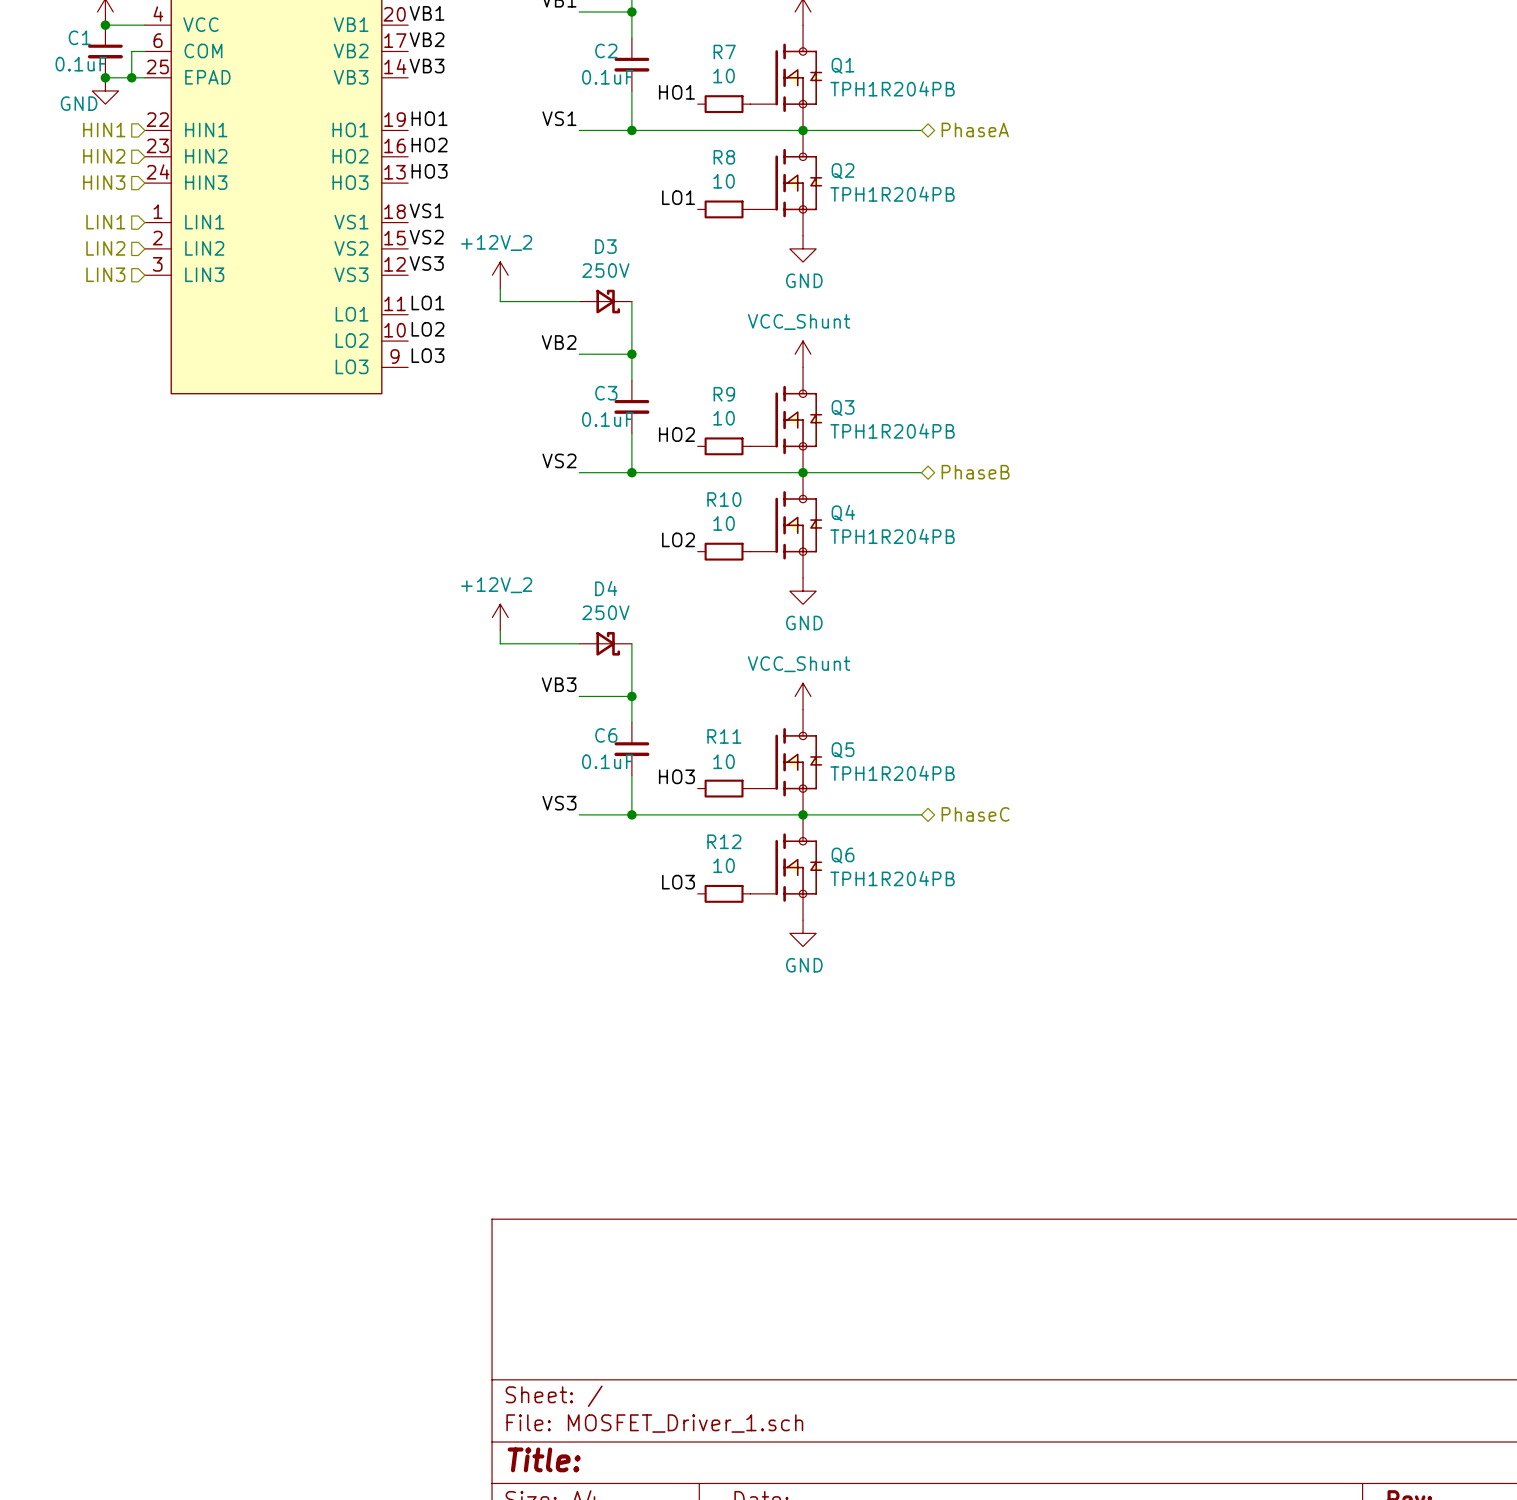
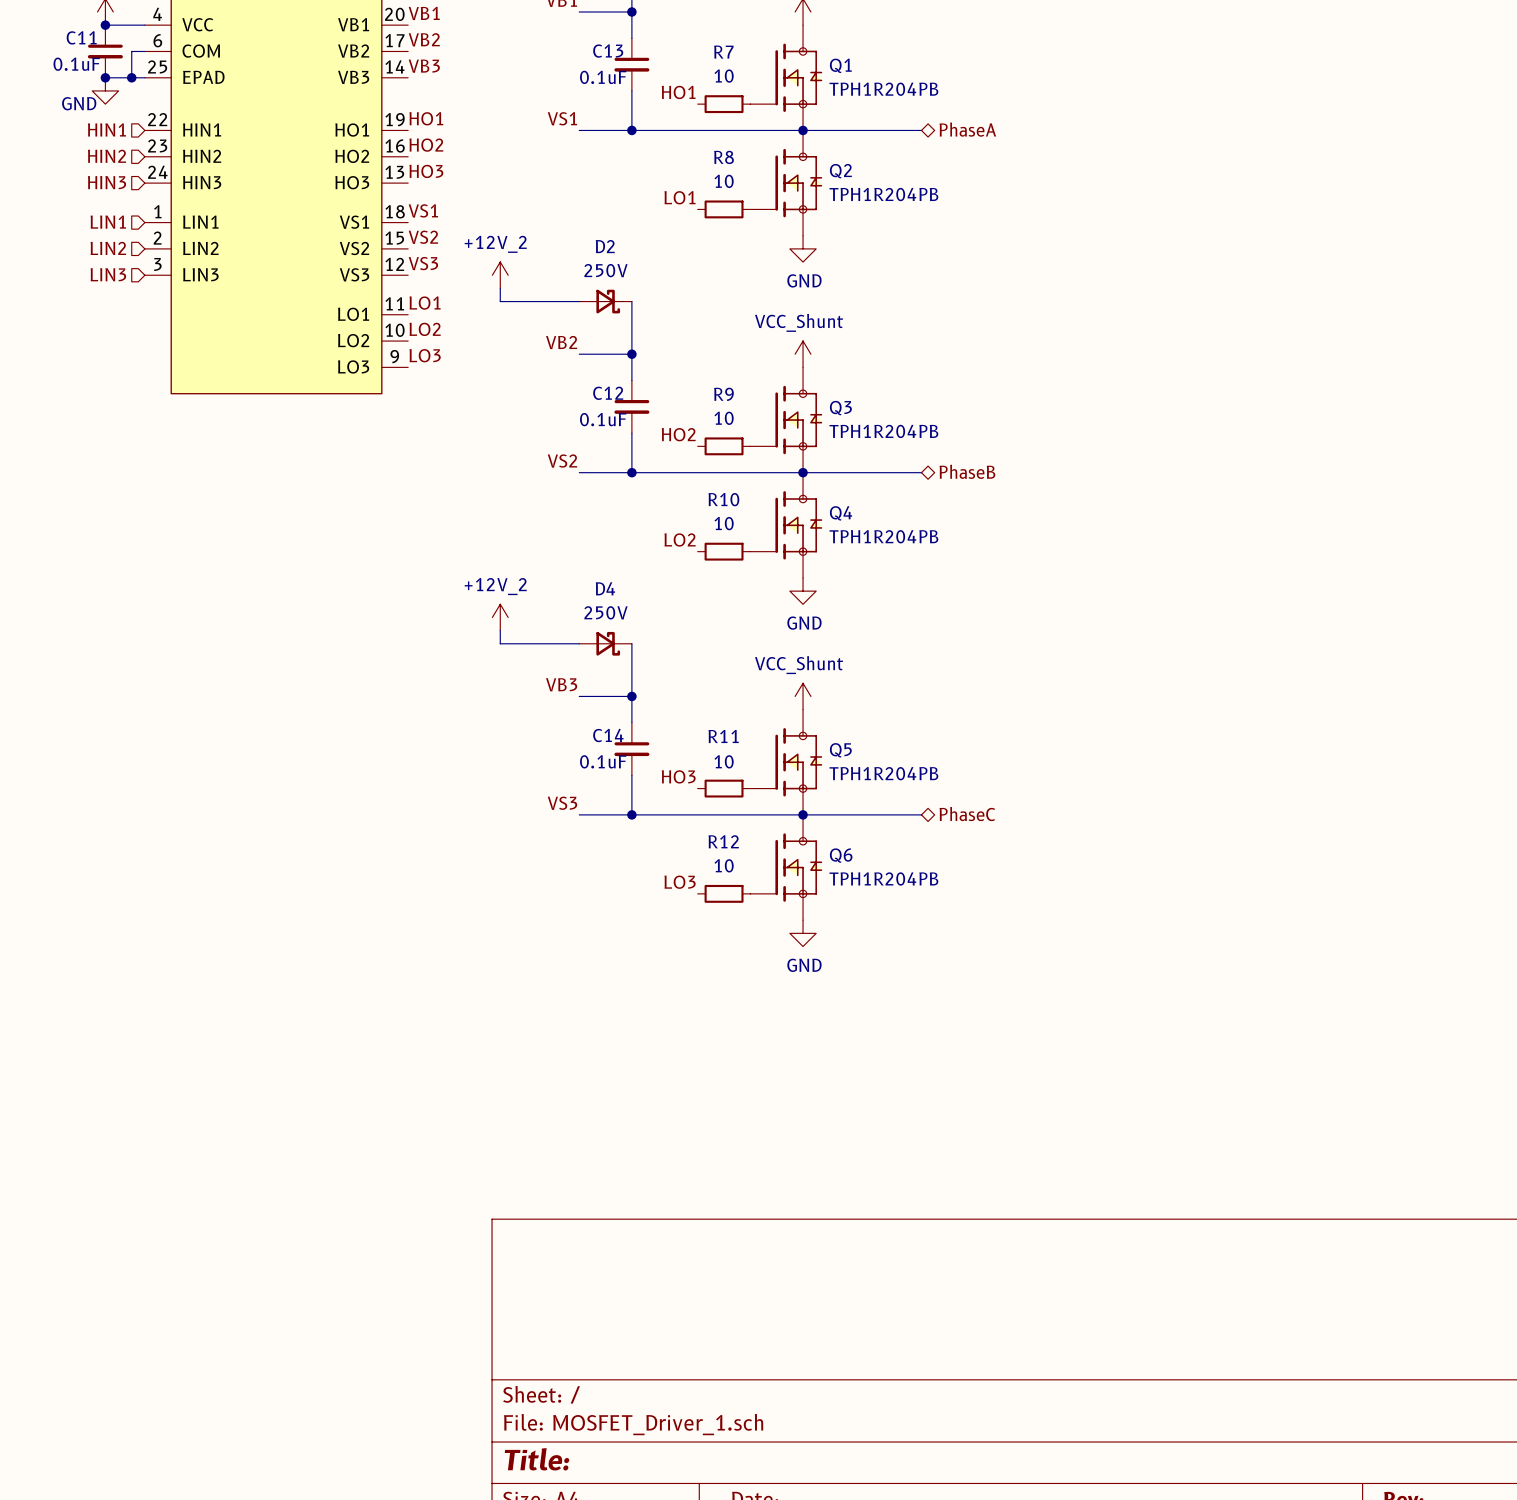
C1 name: C1 (79, 37) -> C11 (81, 37)
C2 name: C2 (606, 50) -> C13 (608, 51)
D3 name: D3 (605, 246) -> D2 (605, 246)
C3 name: C3 (606, 393) -> C12 (608, 393)
C6 name: C6 (606, 735) -> C14 (608, 735)

